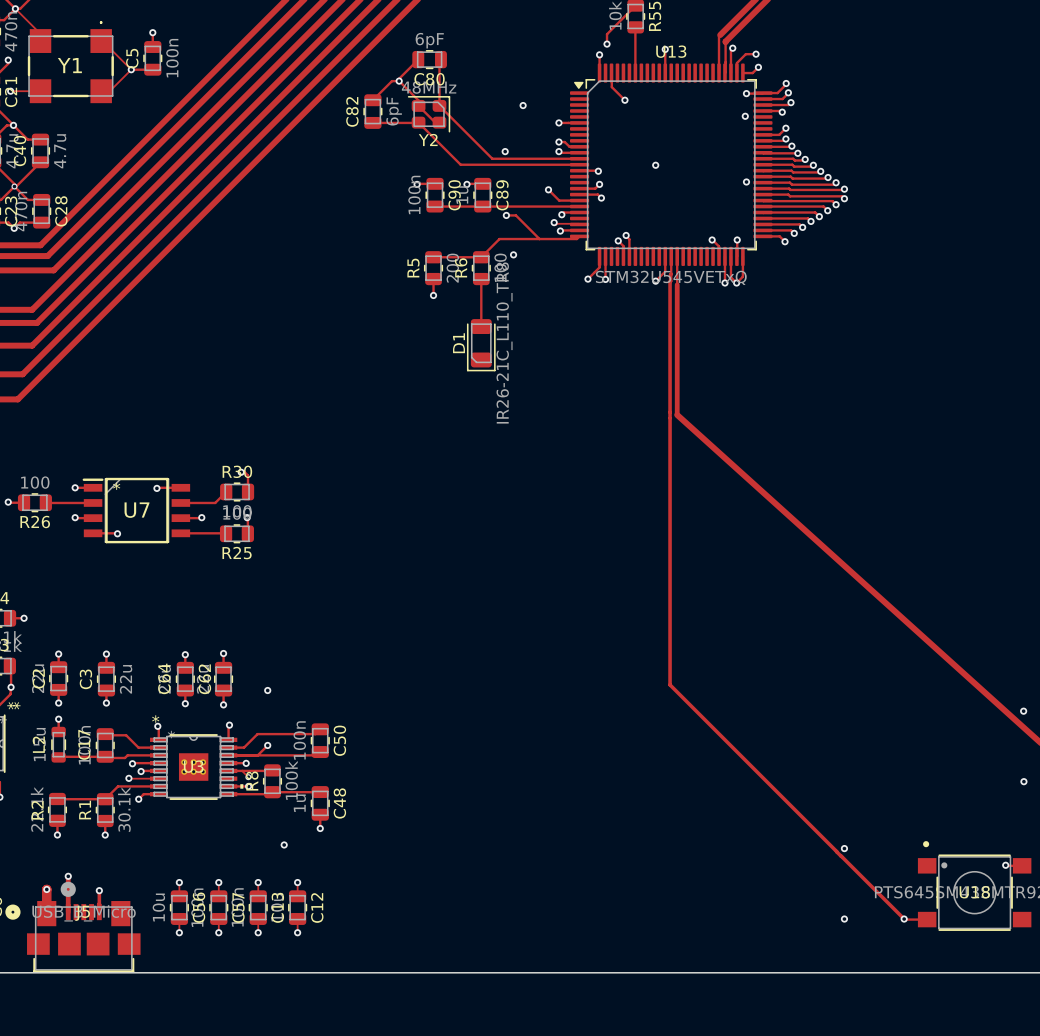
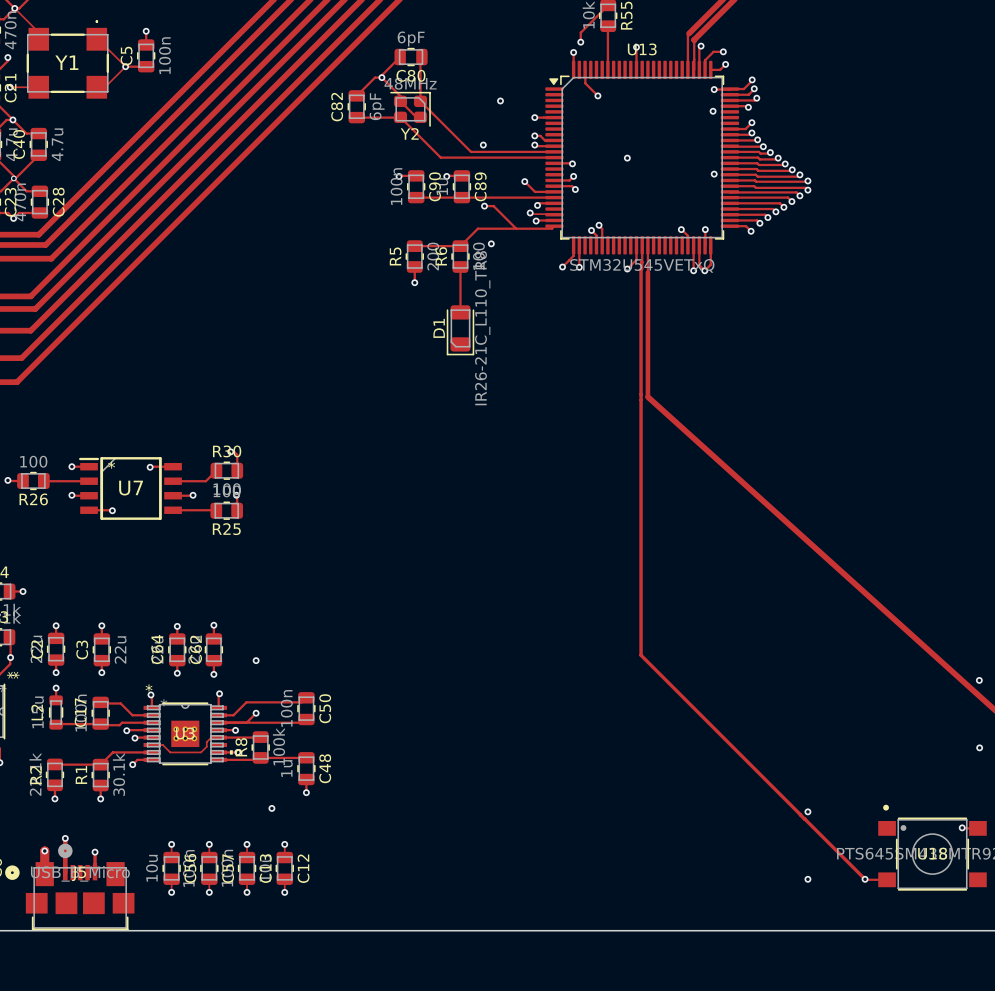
track: none -> (211, 737) (201, 752) (170, 752) (162, 745) (152, 745)
track: (242, 770) (248, 777) -> none
via: (248, 777) -> none
via: (128, 778) -> none
track: (129, 778) (158, 778) -> none

